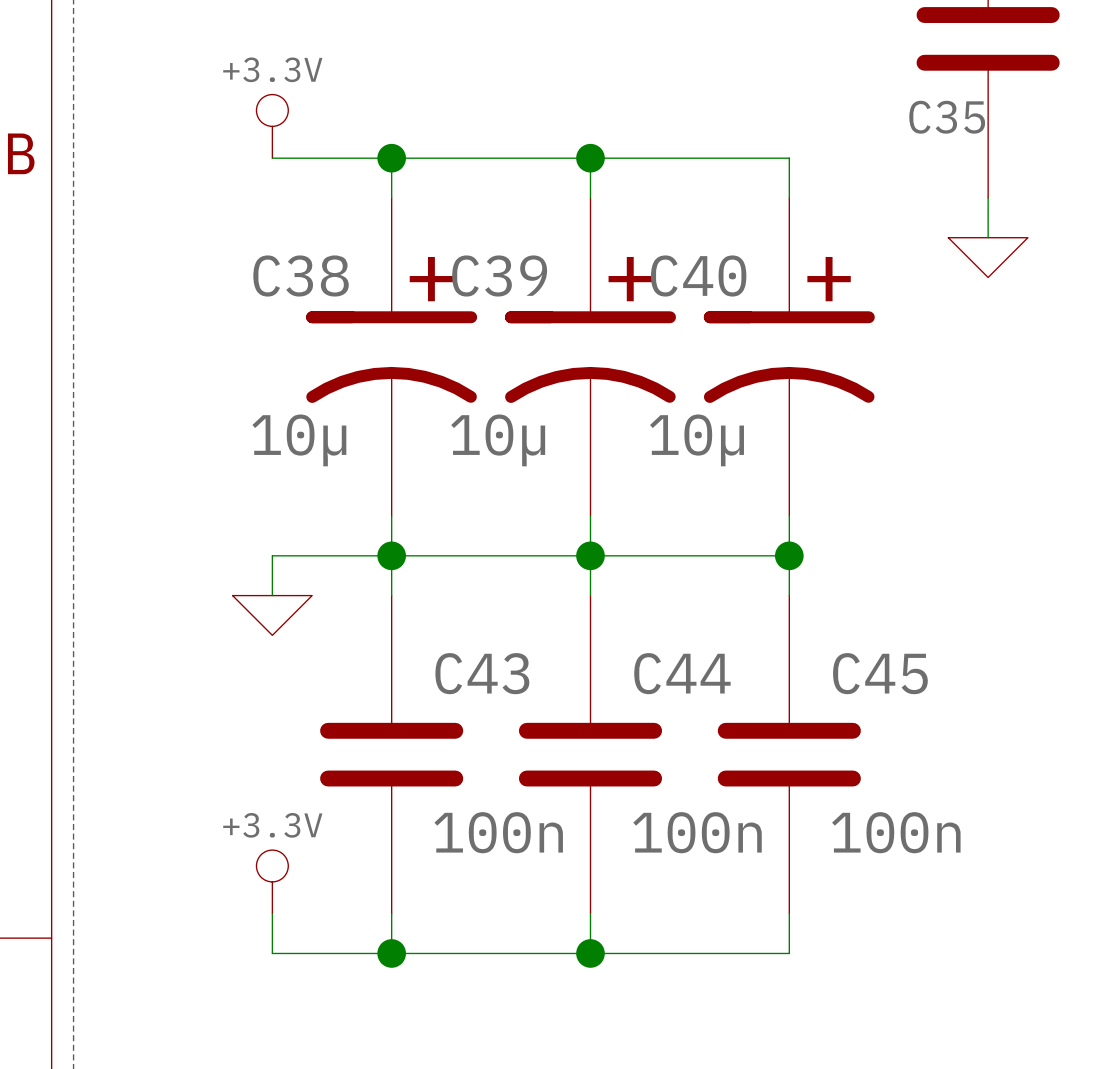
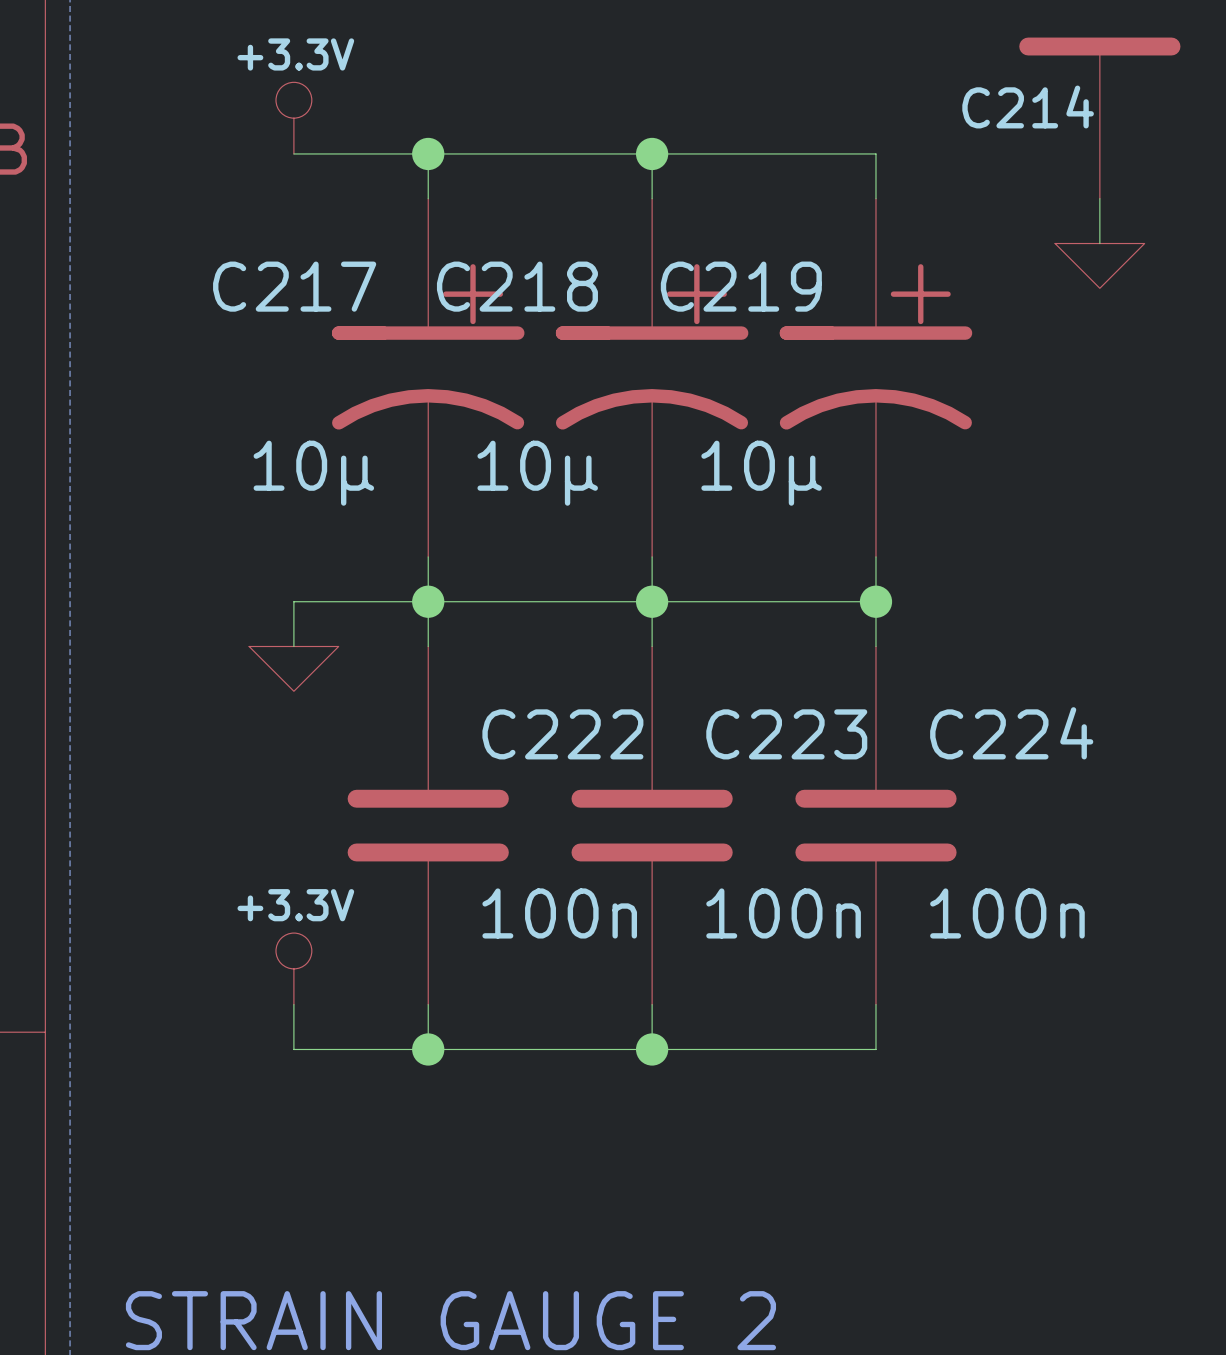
C35 name: C35 (947, 117) -> C214 (1028, 107)
C38 name: C38 (301, 275) -> C217 (294, 286)
C39 name: C39 (499, 275) -> C218 (517, 286)
C40 name: C40 (698, 275) -> C219 (741, 286)
C43 name: C43 (482, 673) -> C222 (562, 734)
C44 name: C44 (682, 673) -> C223 (786, 734)
C45 name: C45 (880, 673) -> C224 (1011, 733)

